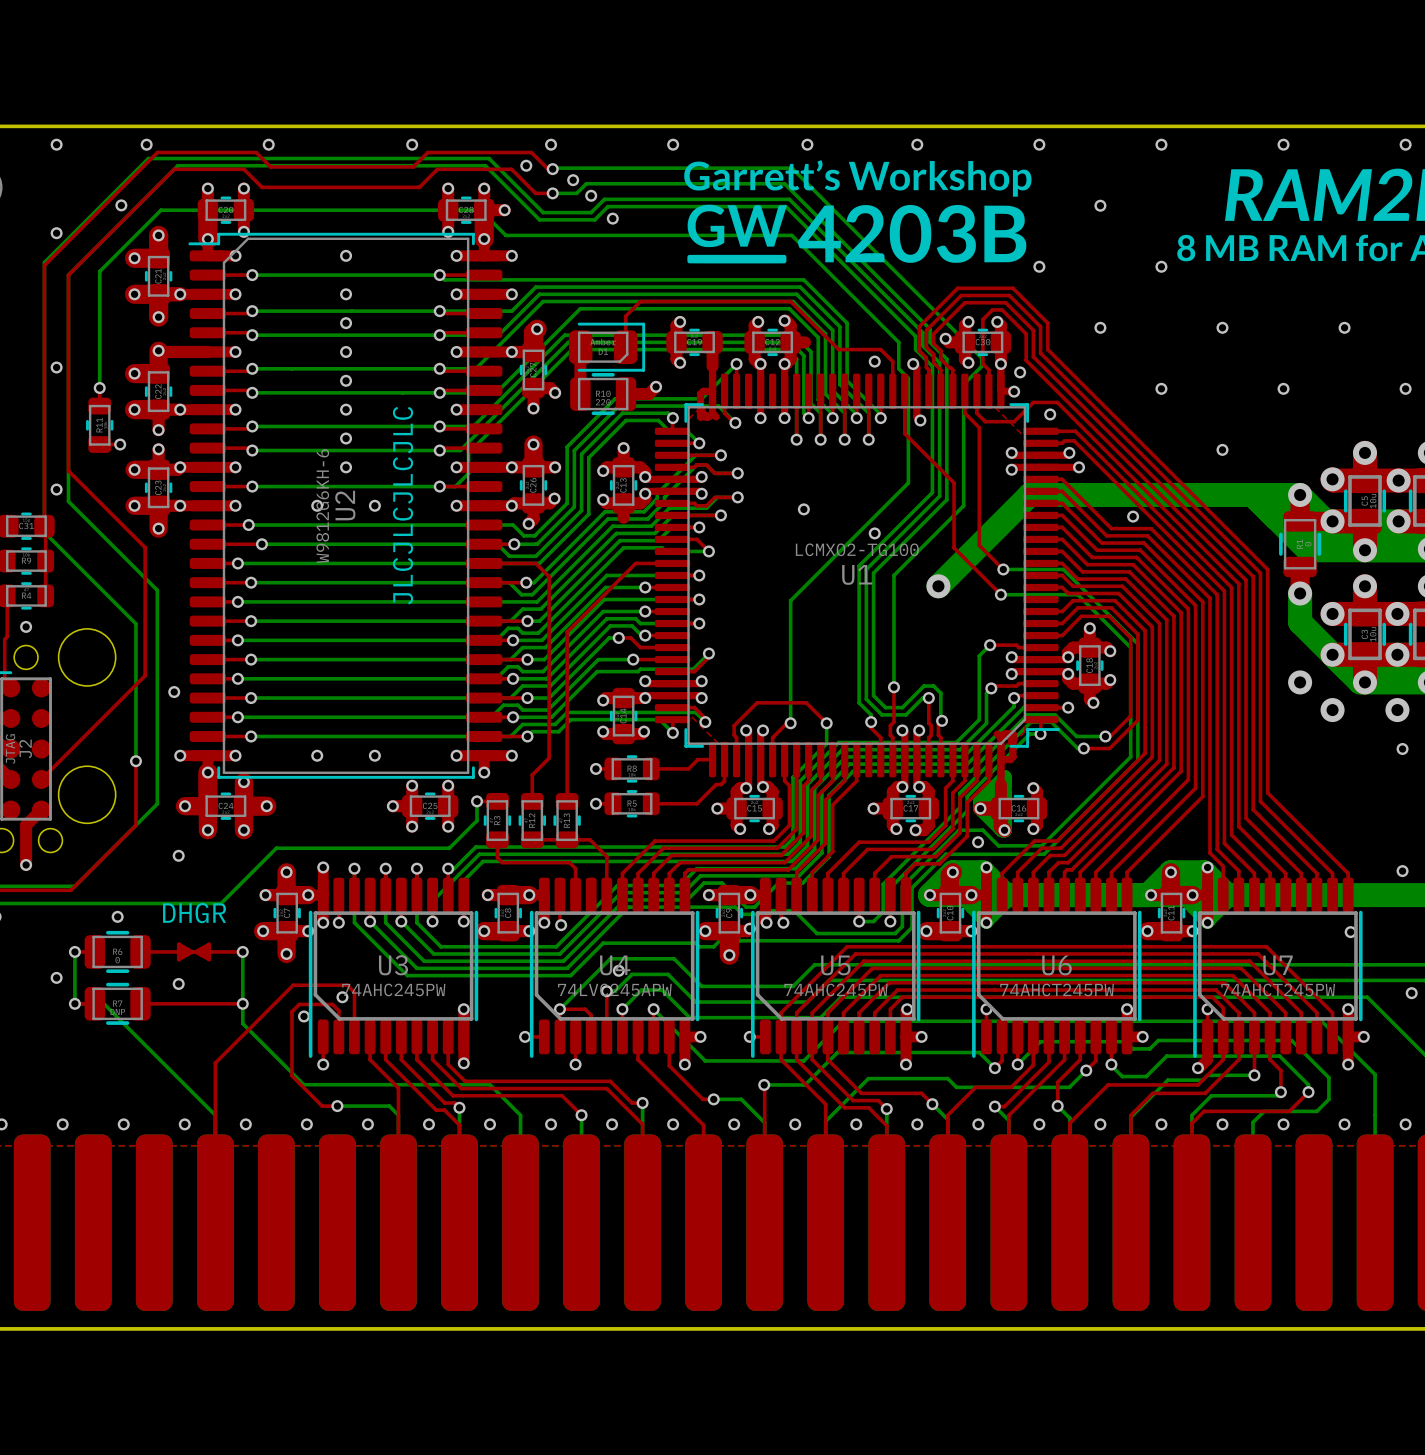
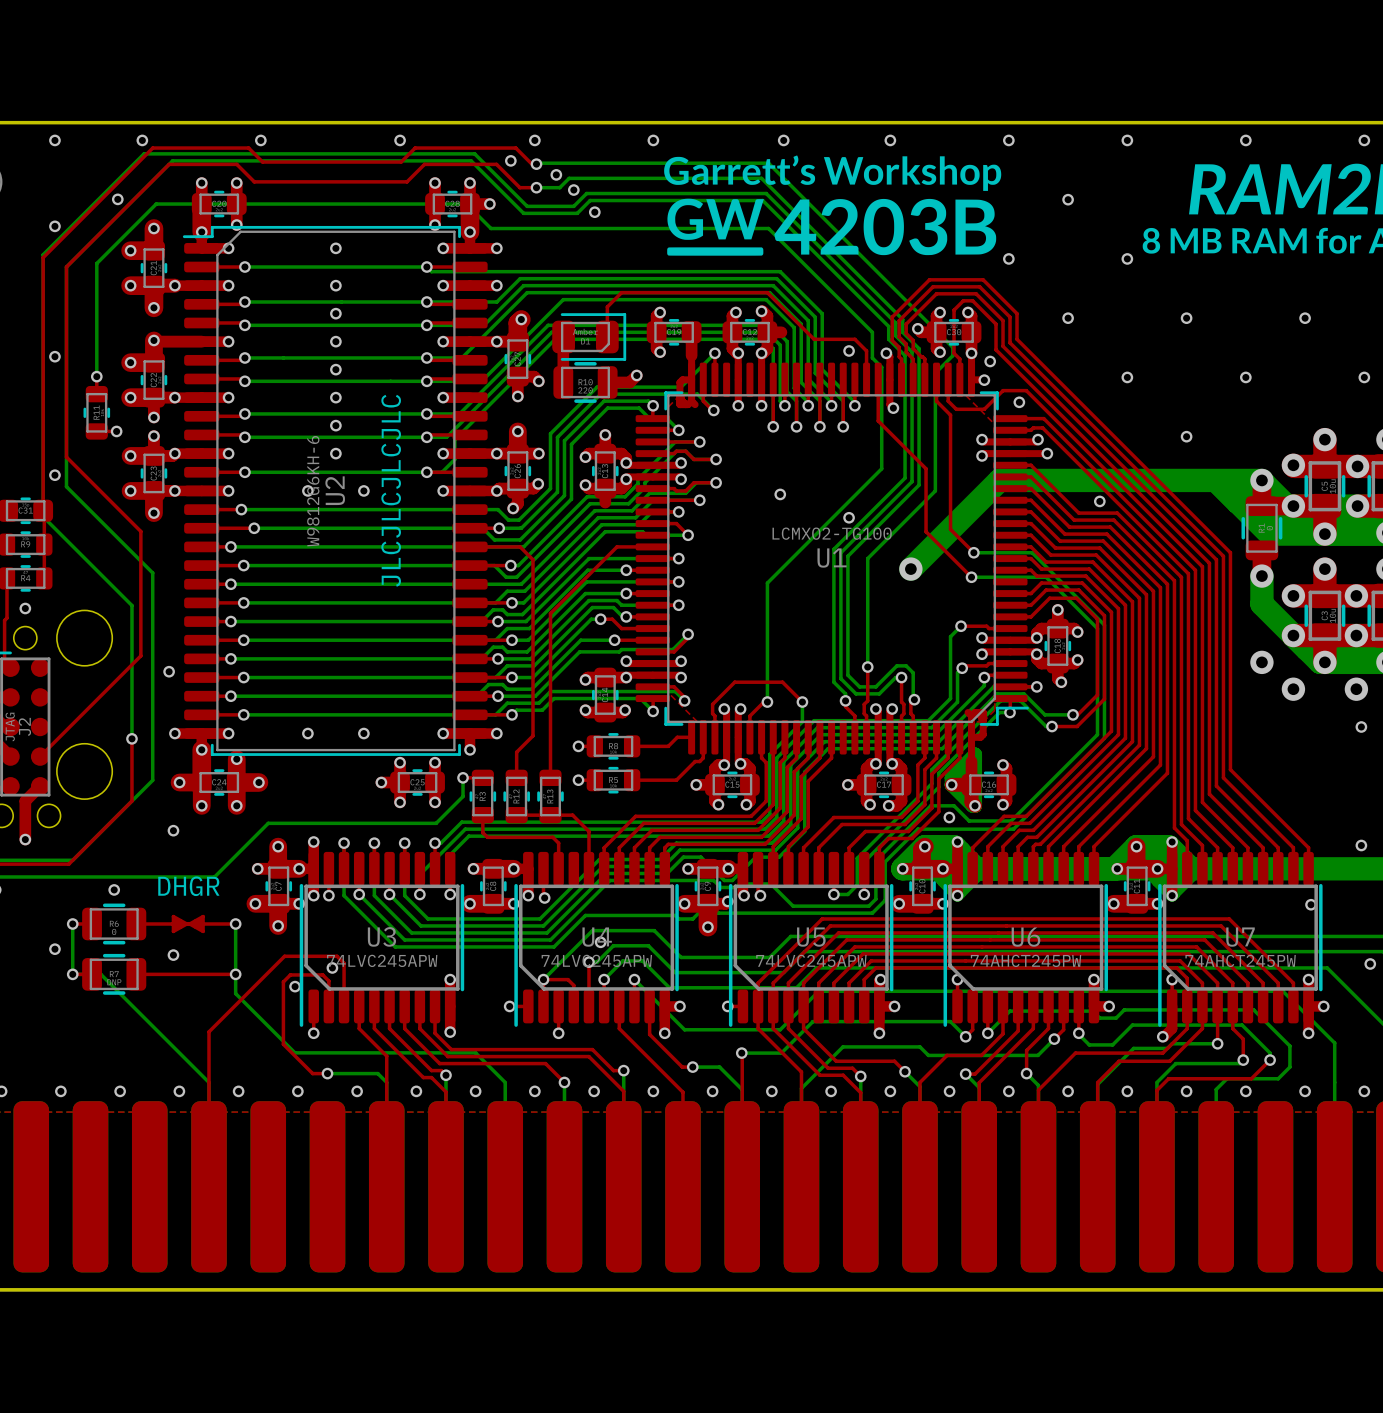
U3 value: 74AHC245PW (393, 989) -> 74LVC245APW (382, 960)
U5 value: 74AHC245PW (835, 989) -> 74LVC245APW (811, 960)

